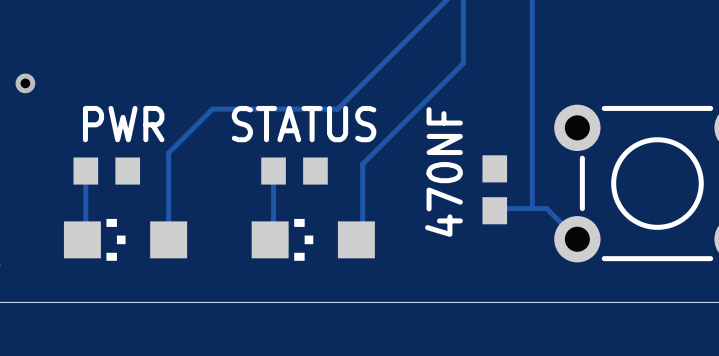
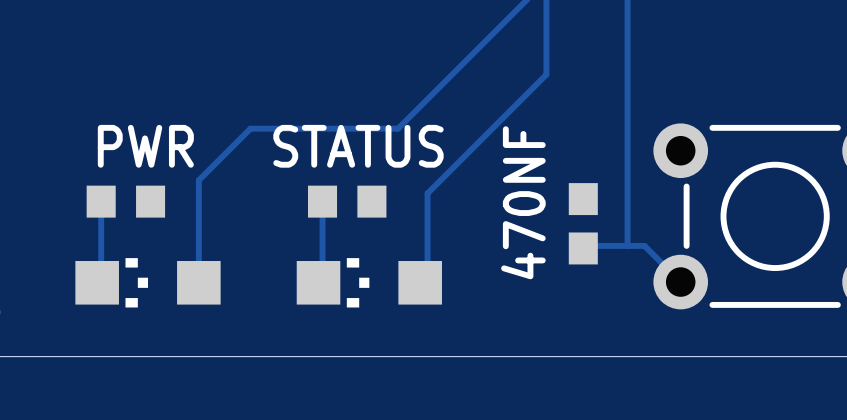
via: (25, 83) -> none

